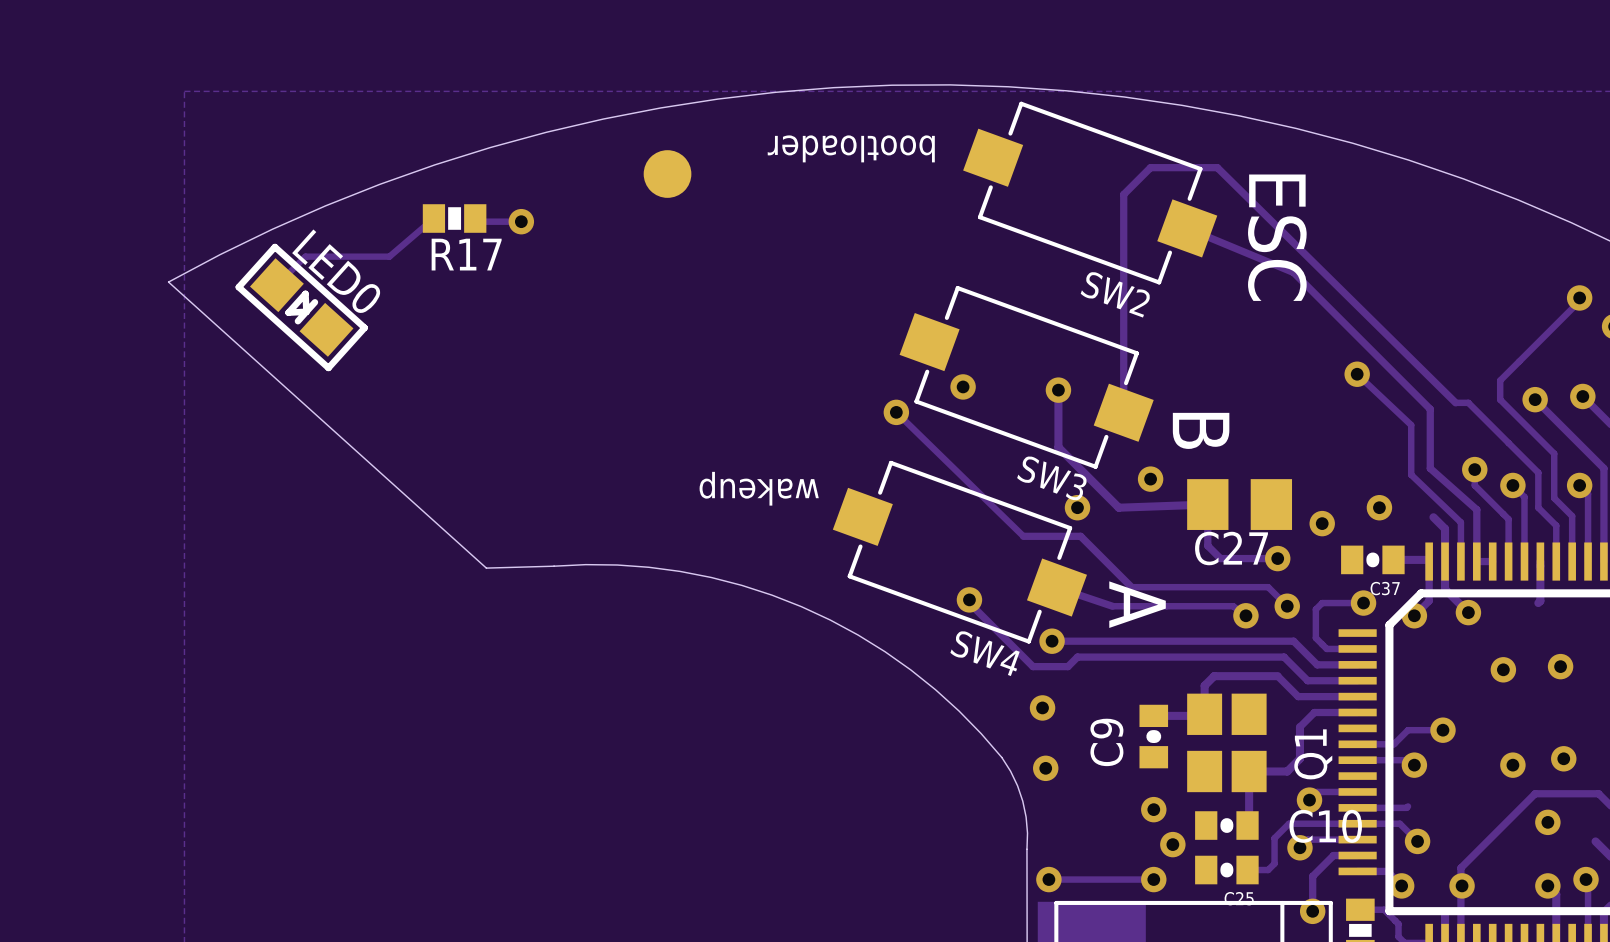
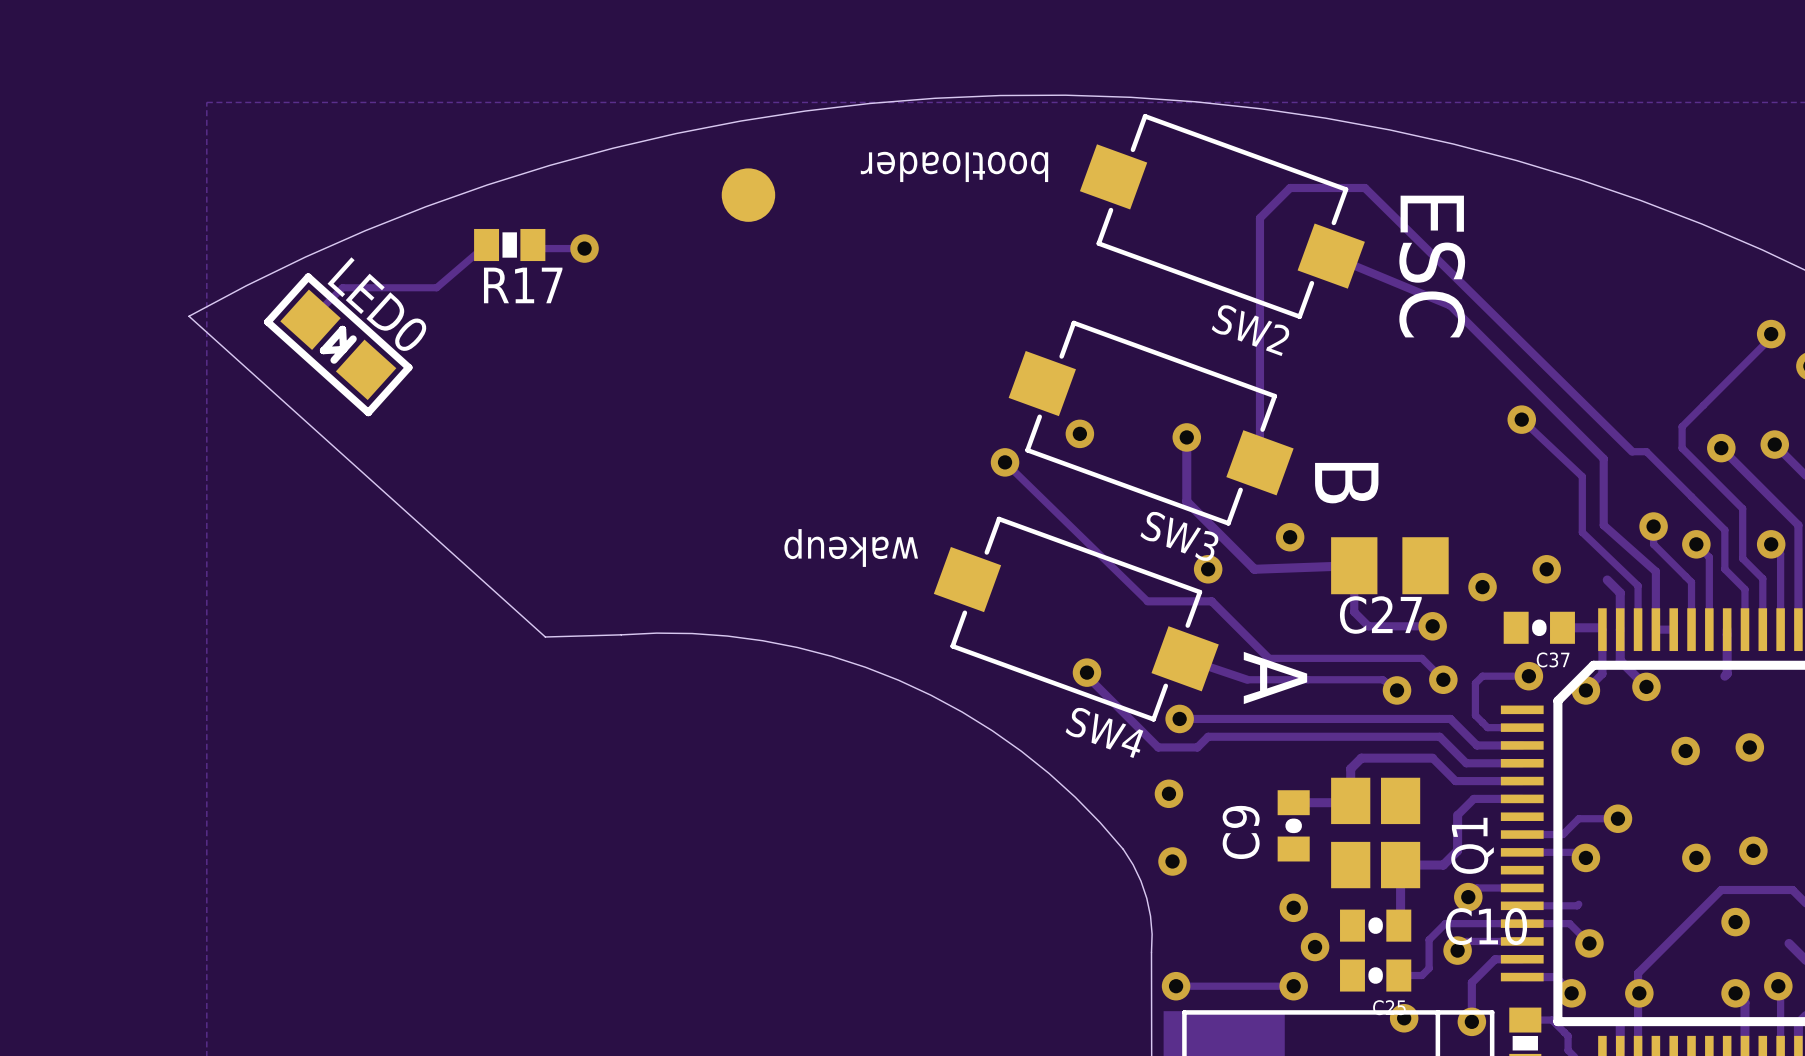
via: none -> (1404, 1018)

